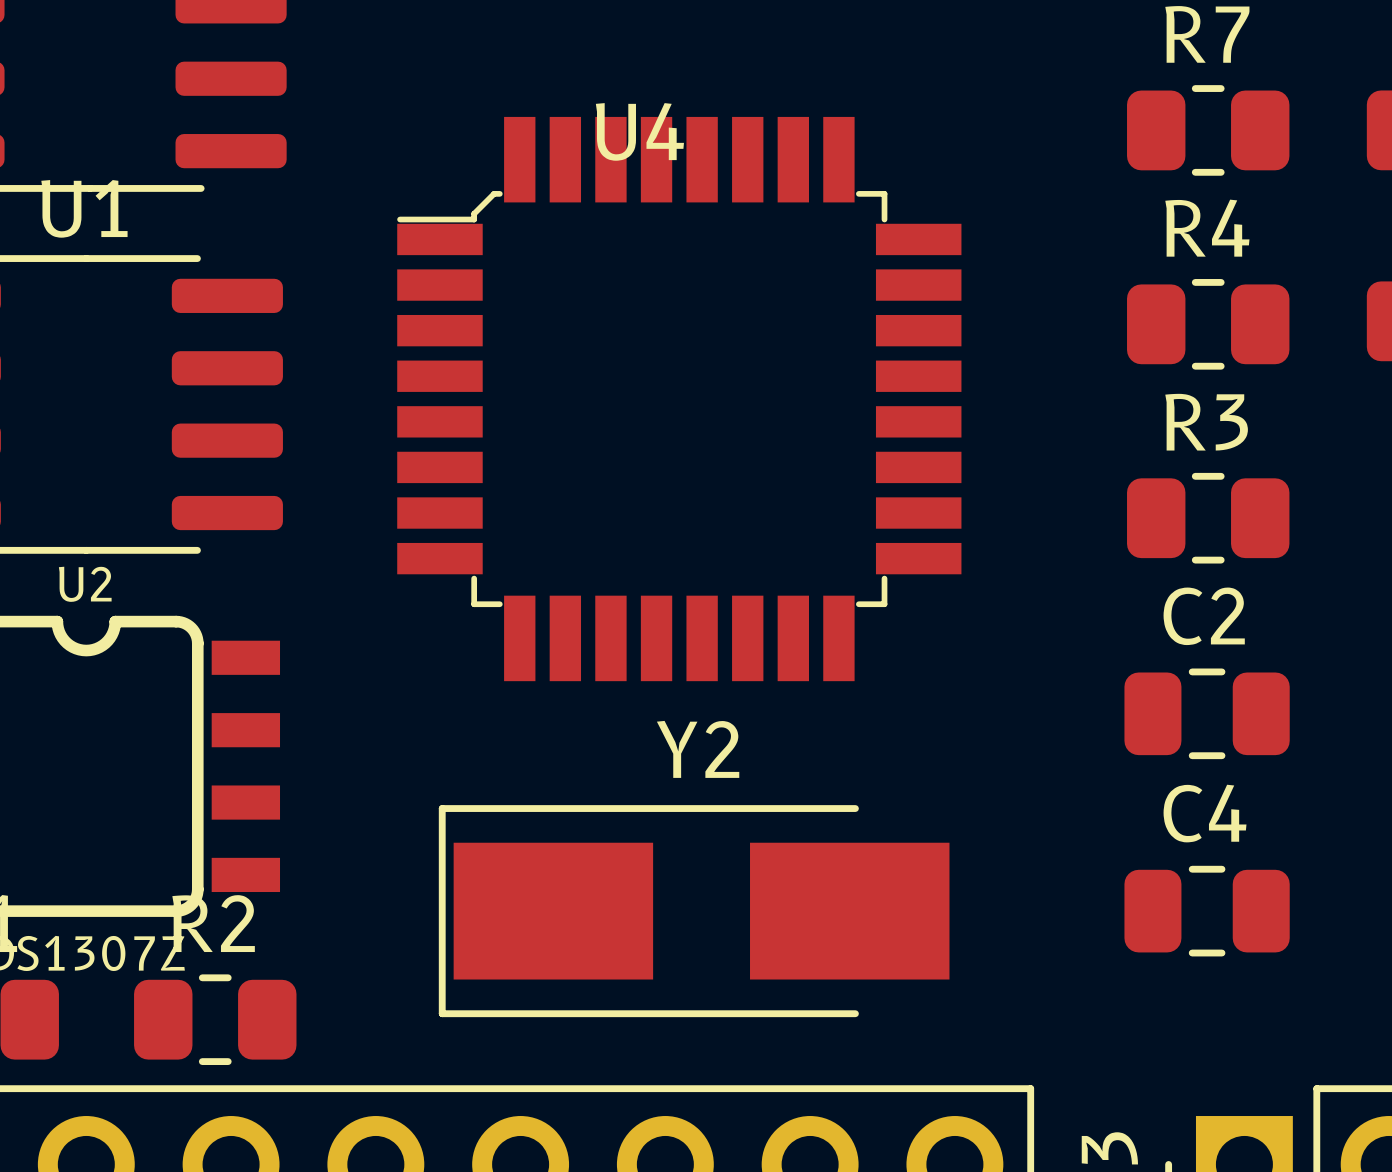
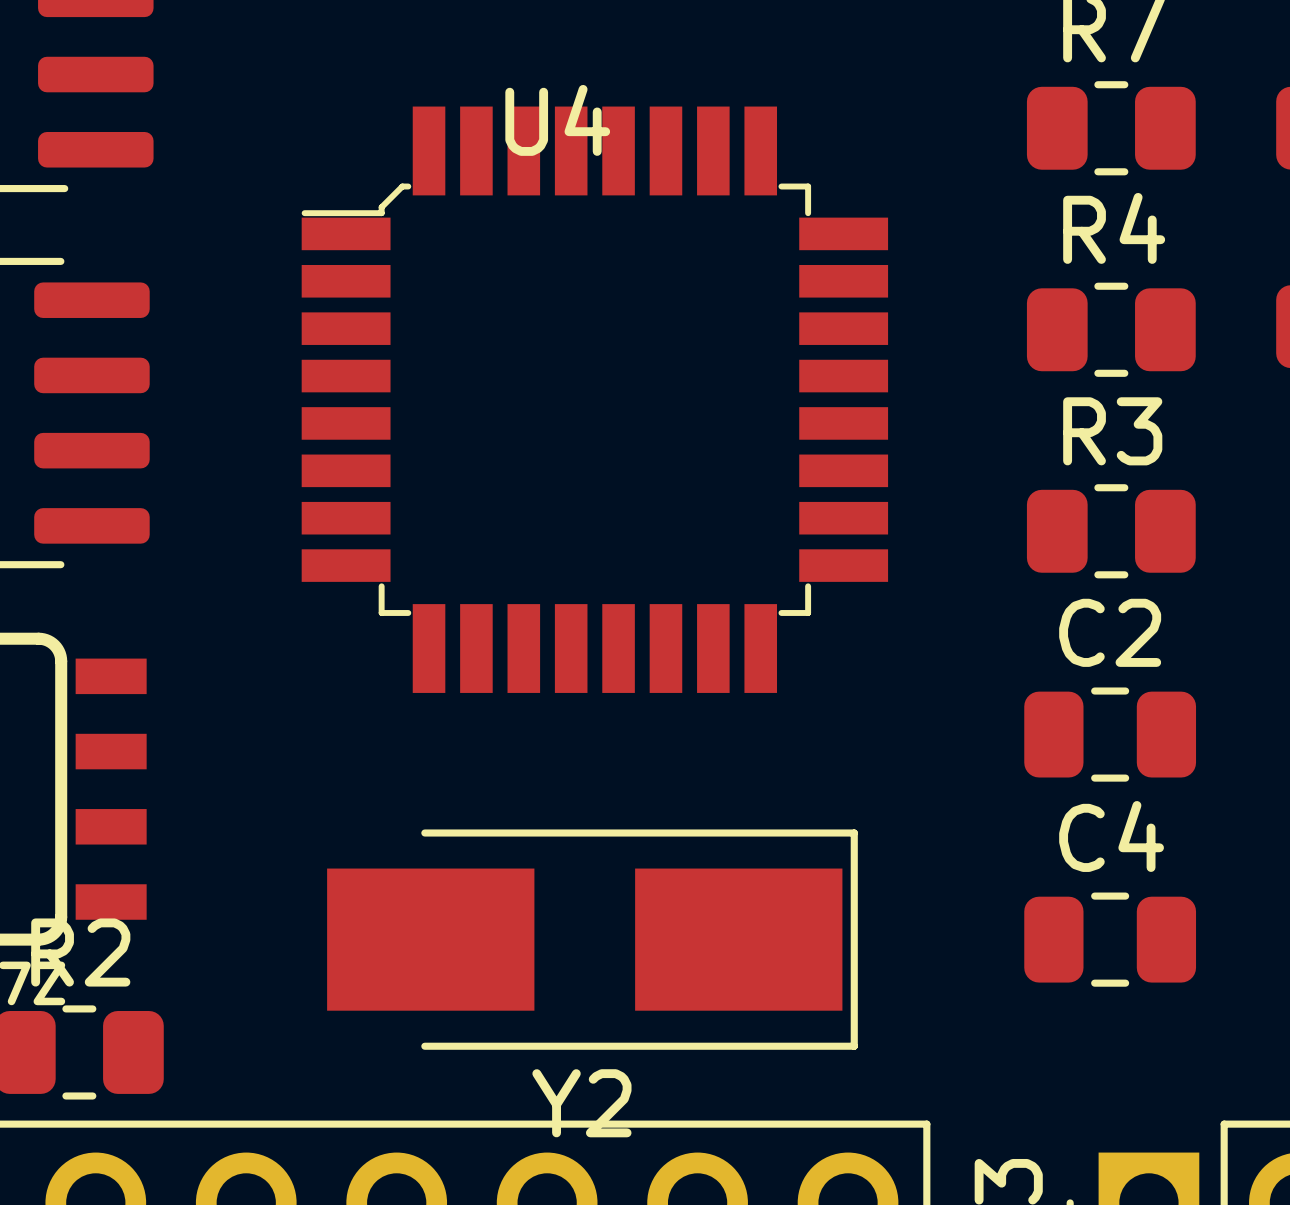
U4 position: (679, 399) -> (594, 399)
Y2 rotation: 0° (694, 911) -> 180° (592, 939)

